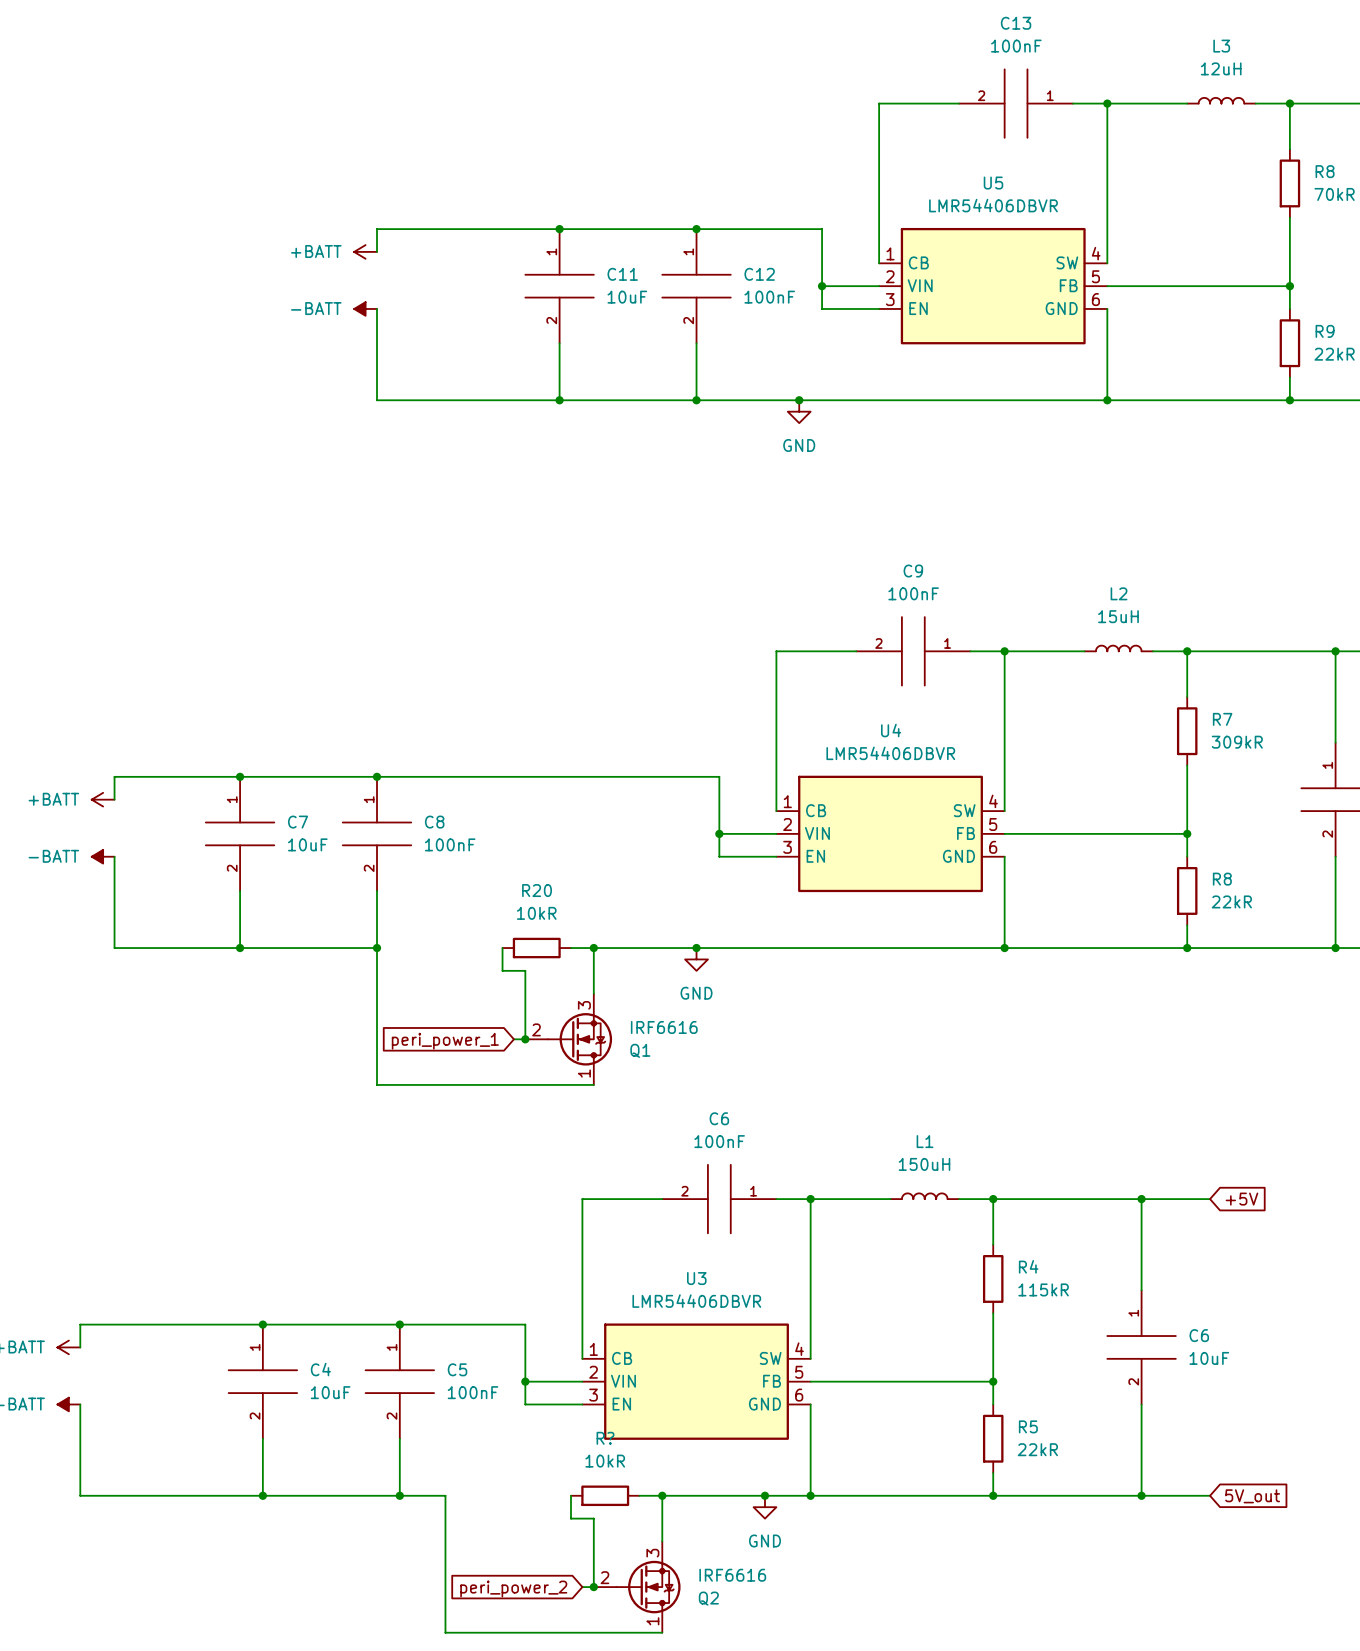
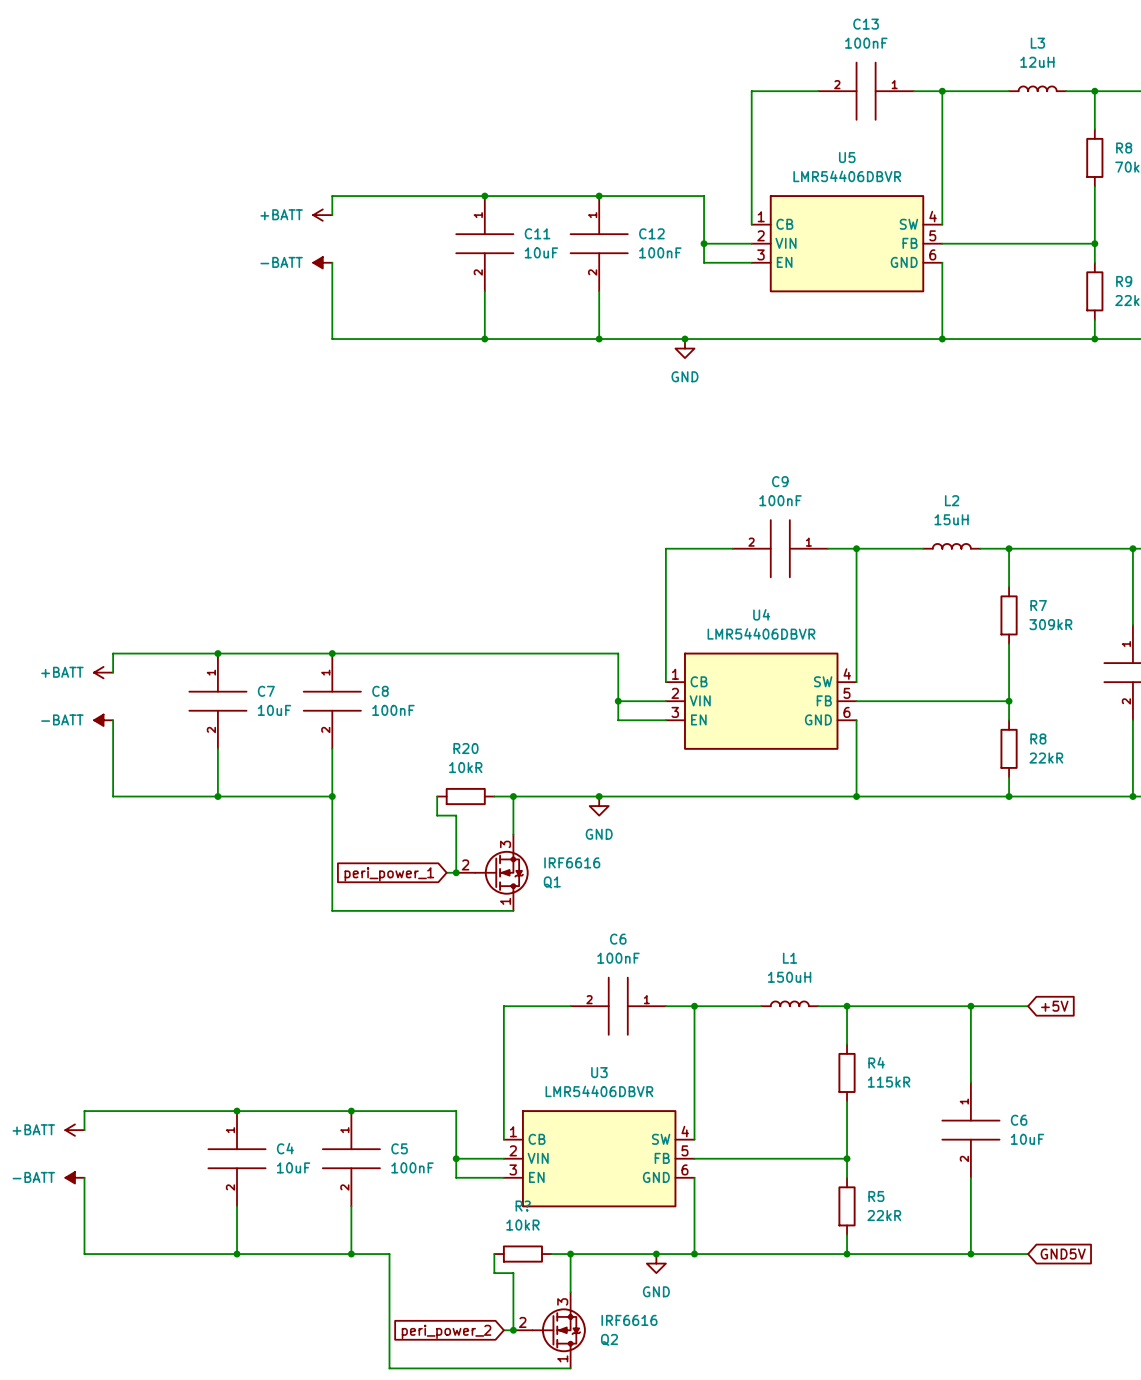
global label: 5V_out (1252, 1496) -> GND5V (1063, 1254)

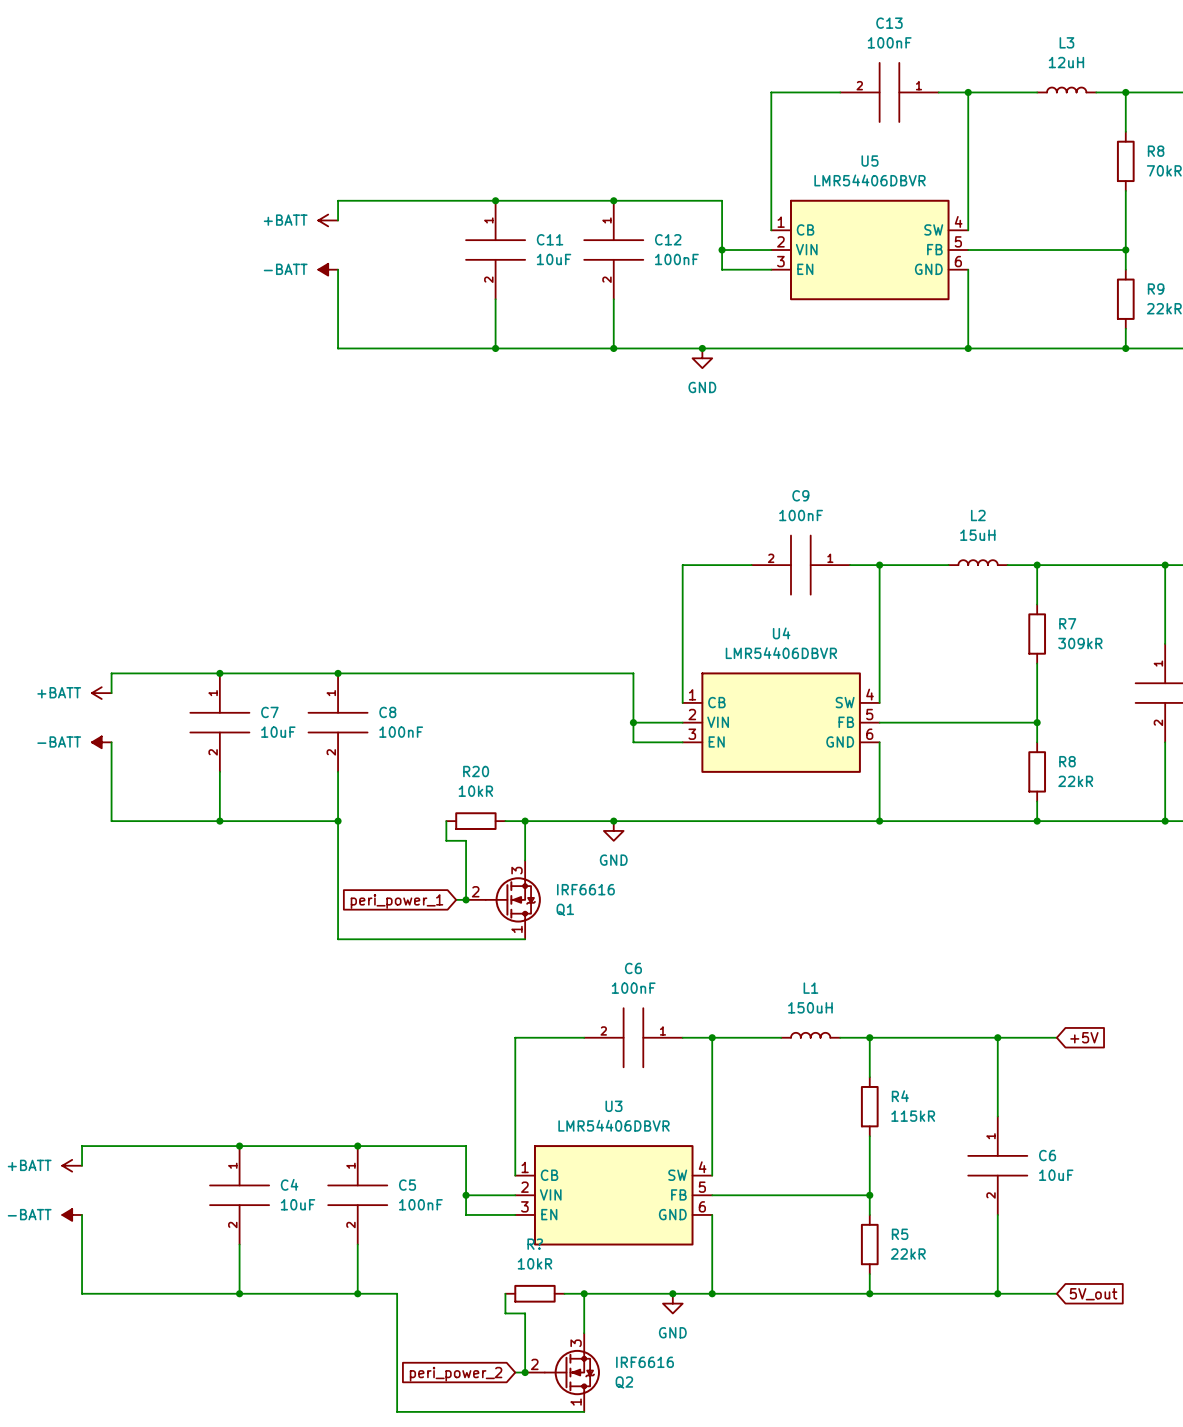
global label: GND5V (1063, 1254) -> 5V_out (1093, 1294)

